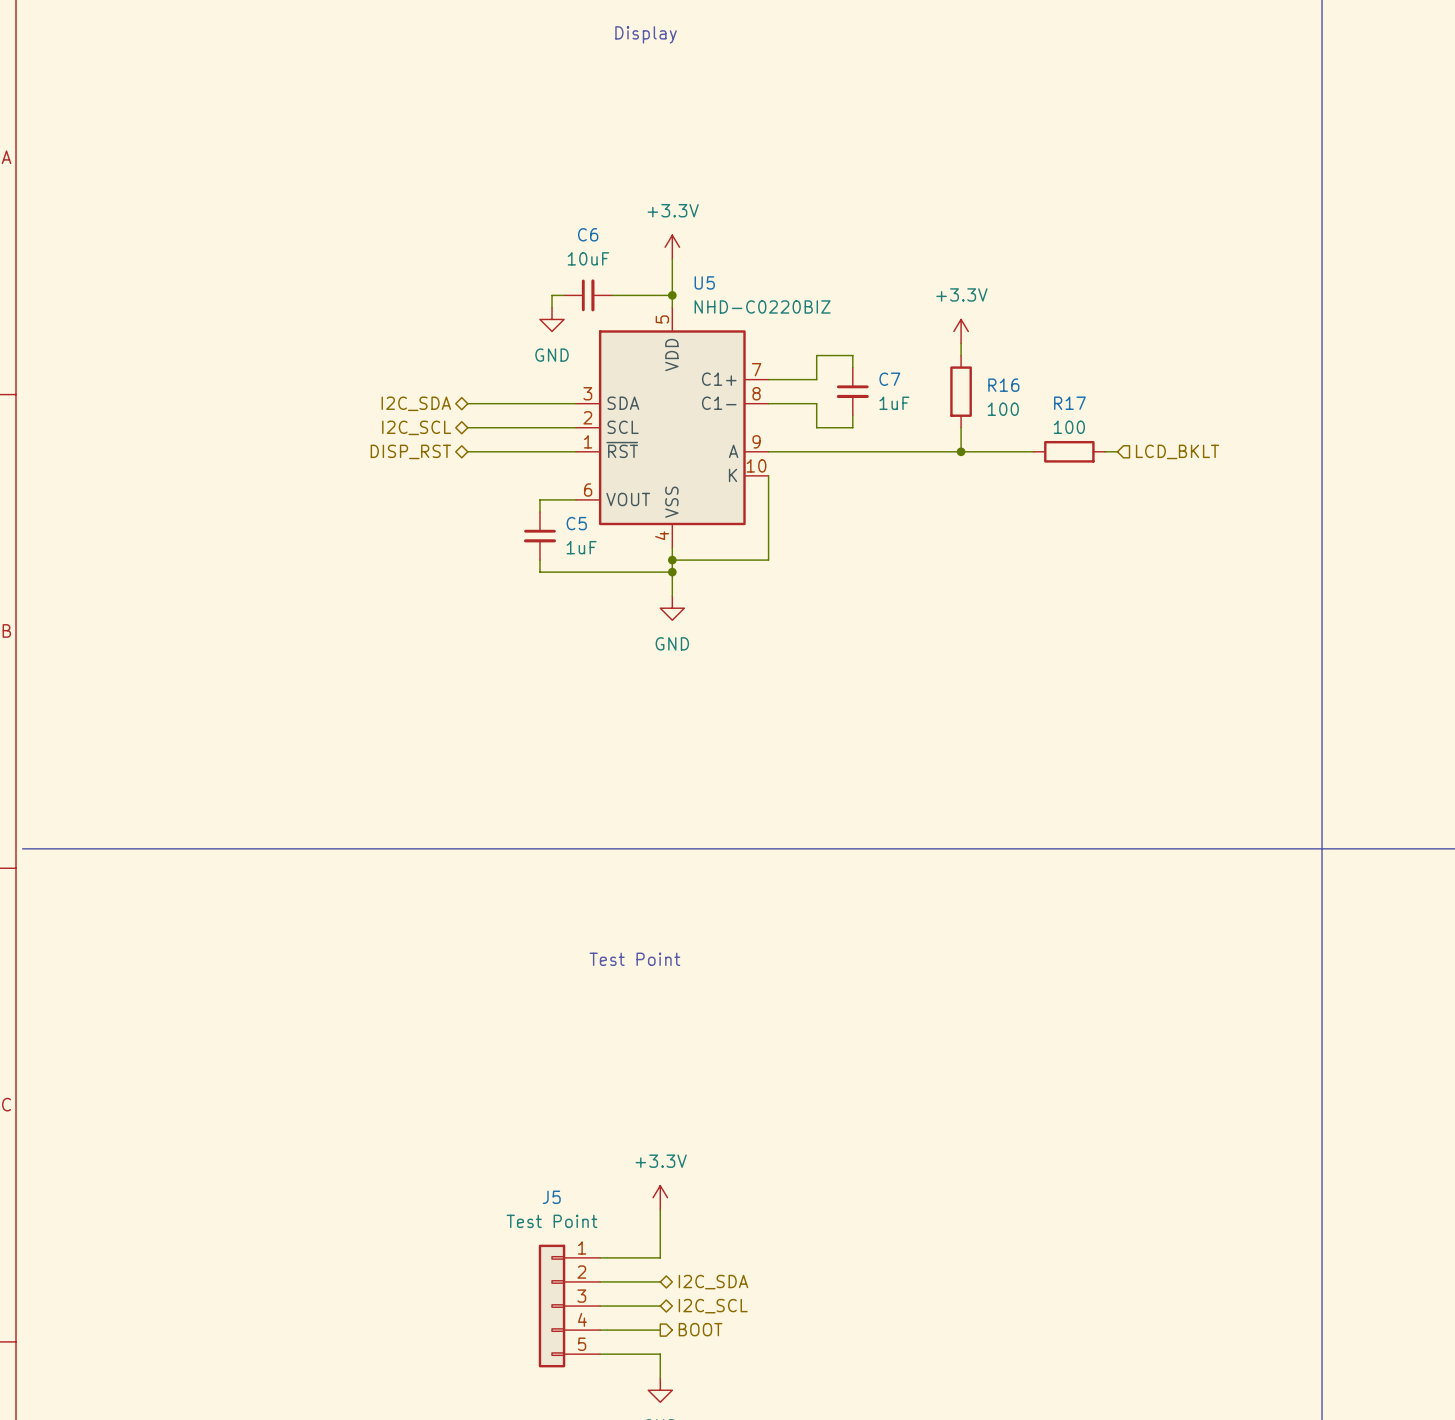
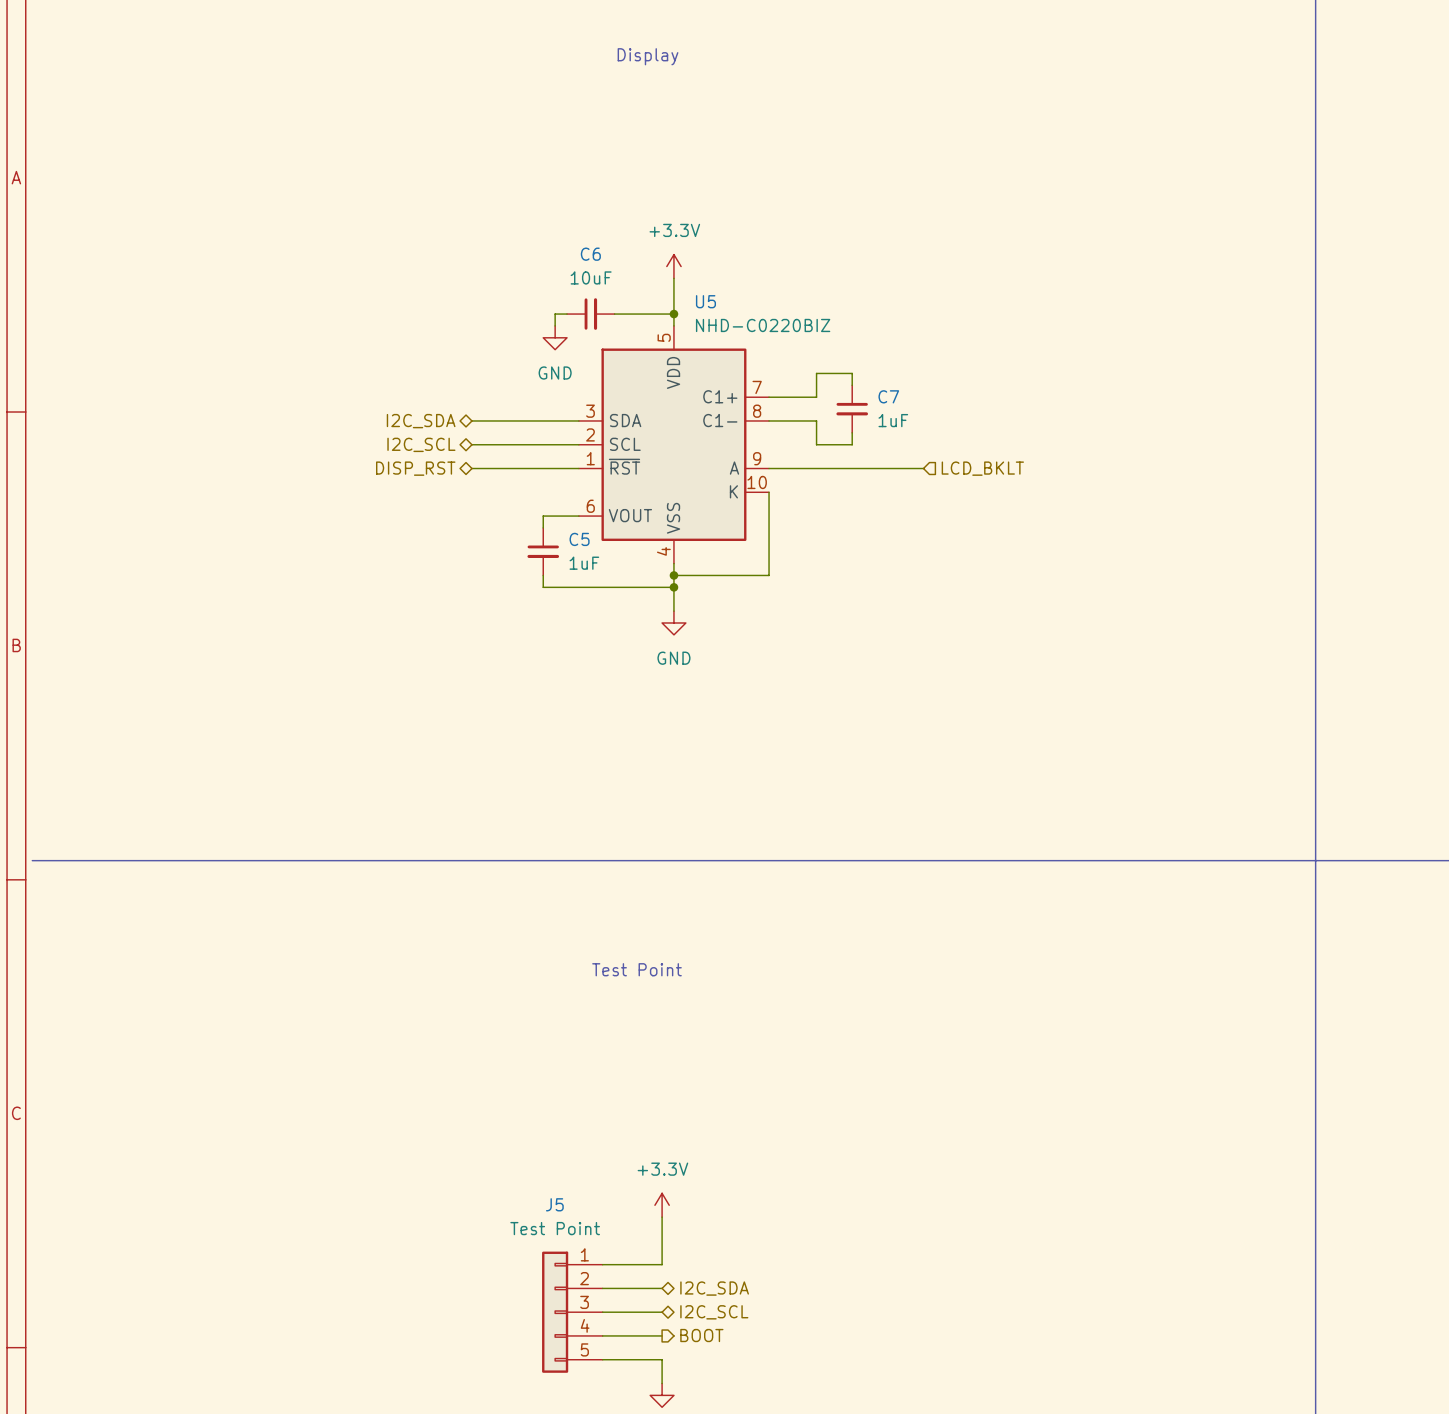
power symbol: +3.3V (961, 331) -> none
wire: (961, 343) (961, 355) -> none
R16: 100 (961, 391) -> none
wire: (961, 427) (961, 451) -> none
wire: (924, 451) (1033, 451) -> none
junction: (961, 451) -> none
R17: 100 (1069, 451) -> none
wire: (1105, 451) (1117, 451) -> none
hierarchical label position: LCD_BKLT (1177, 451) -> LCD_BKLT (982, 468)

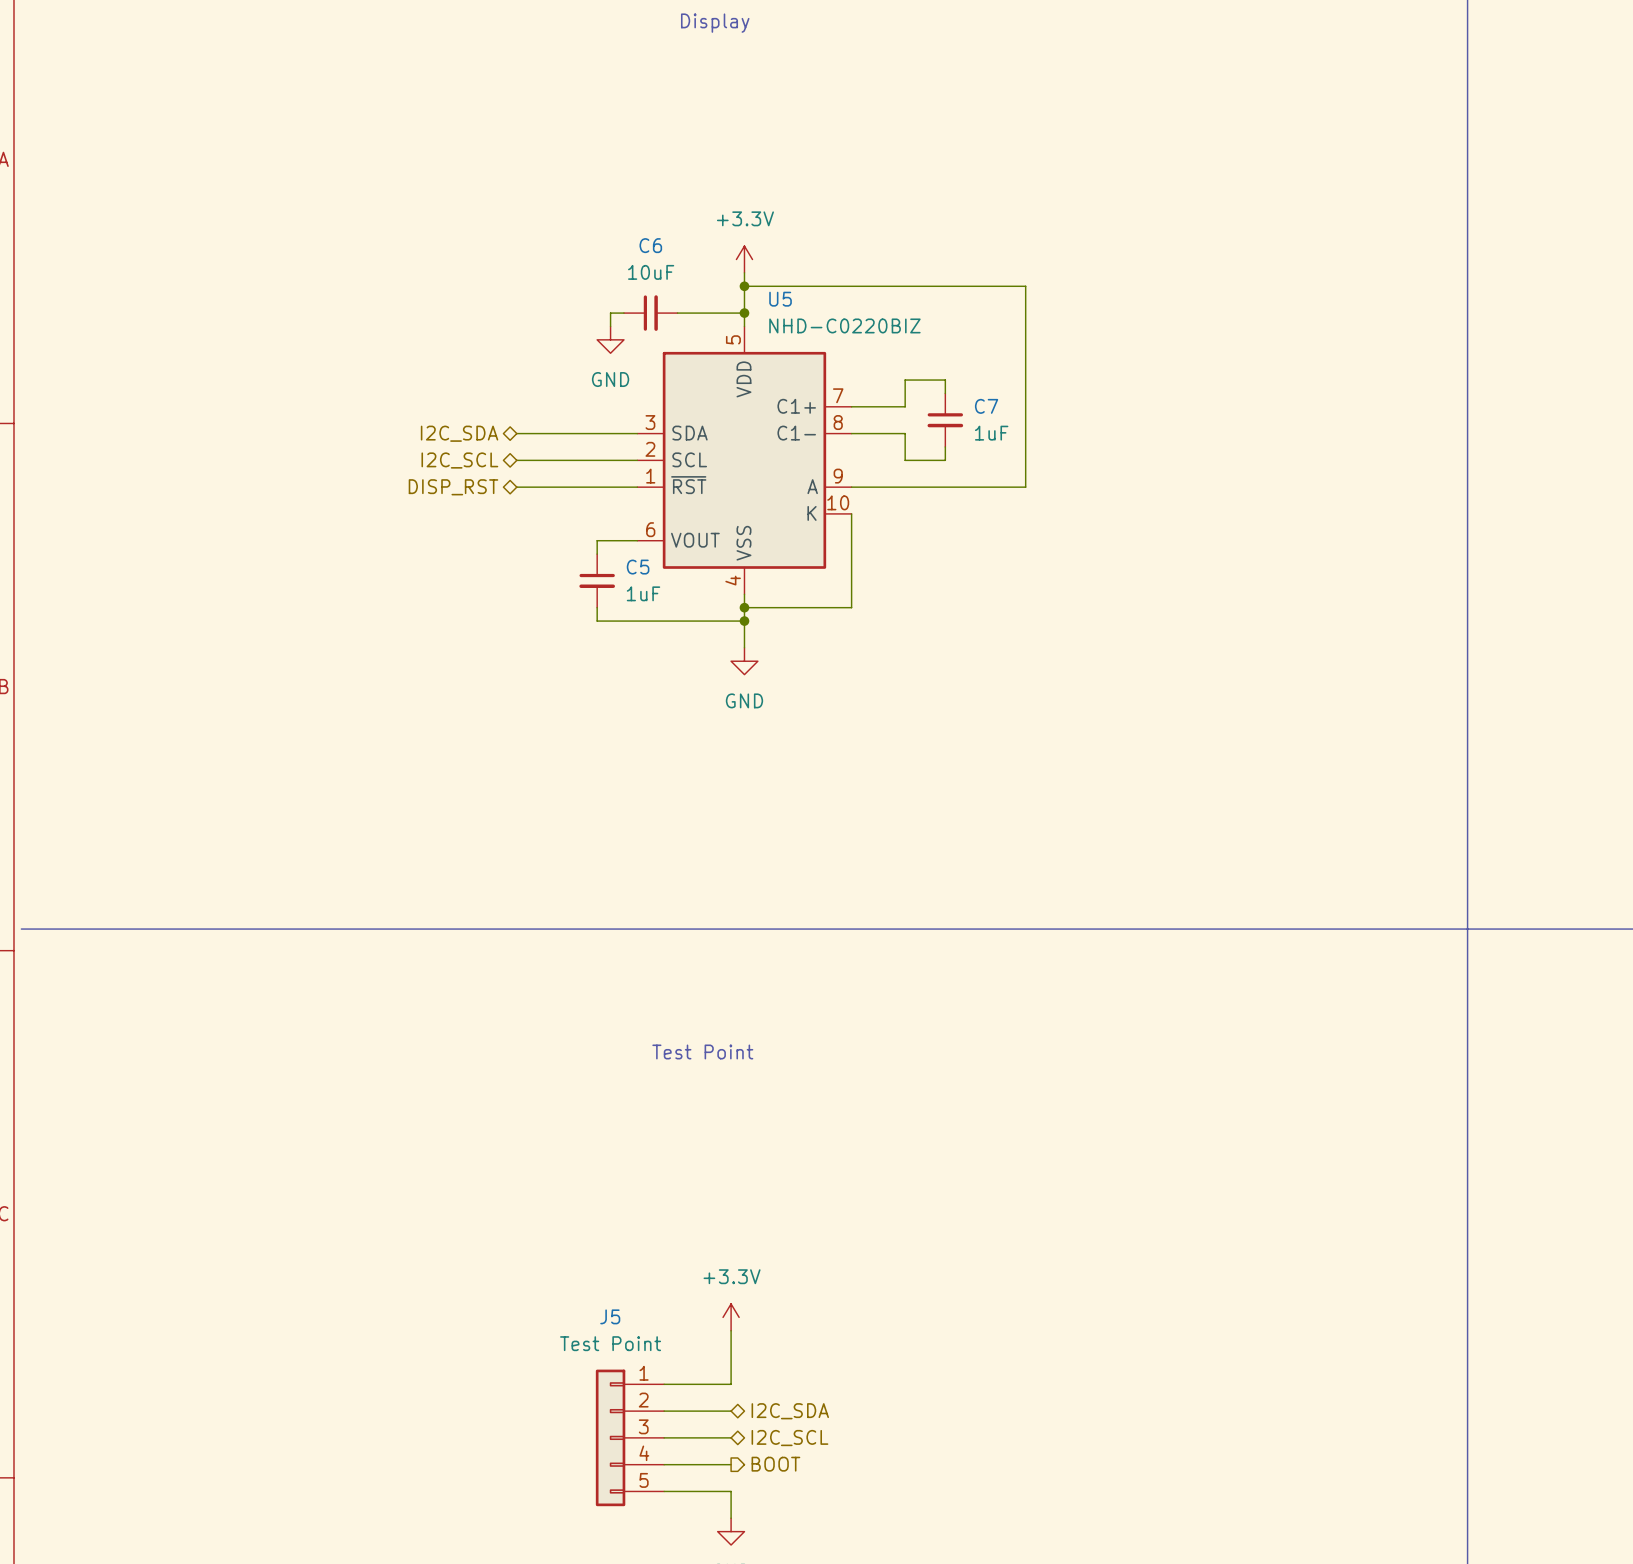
wire: none -> (744, 286) (1025, 286) (1025, 487)
junction: none -> (744, 286)
hierarchical label: LCD_BKLT (982, 468) -> none

